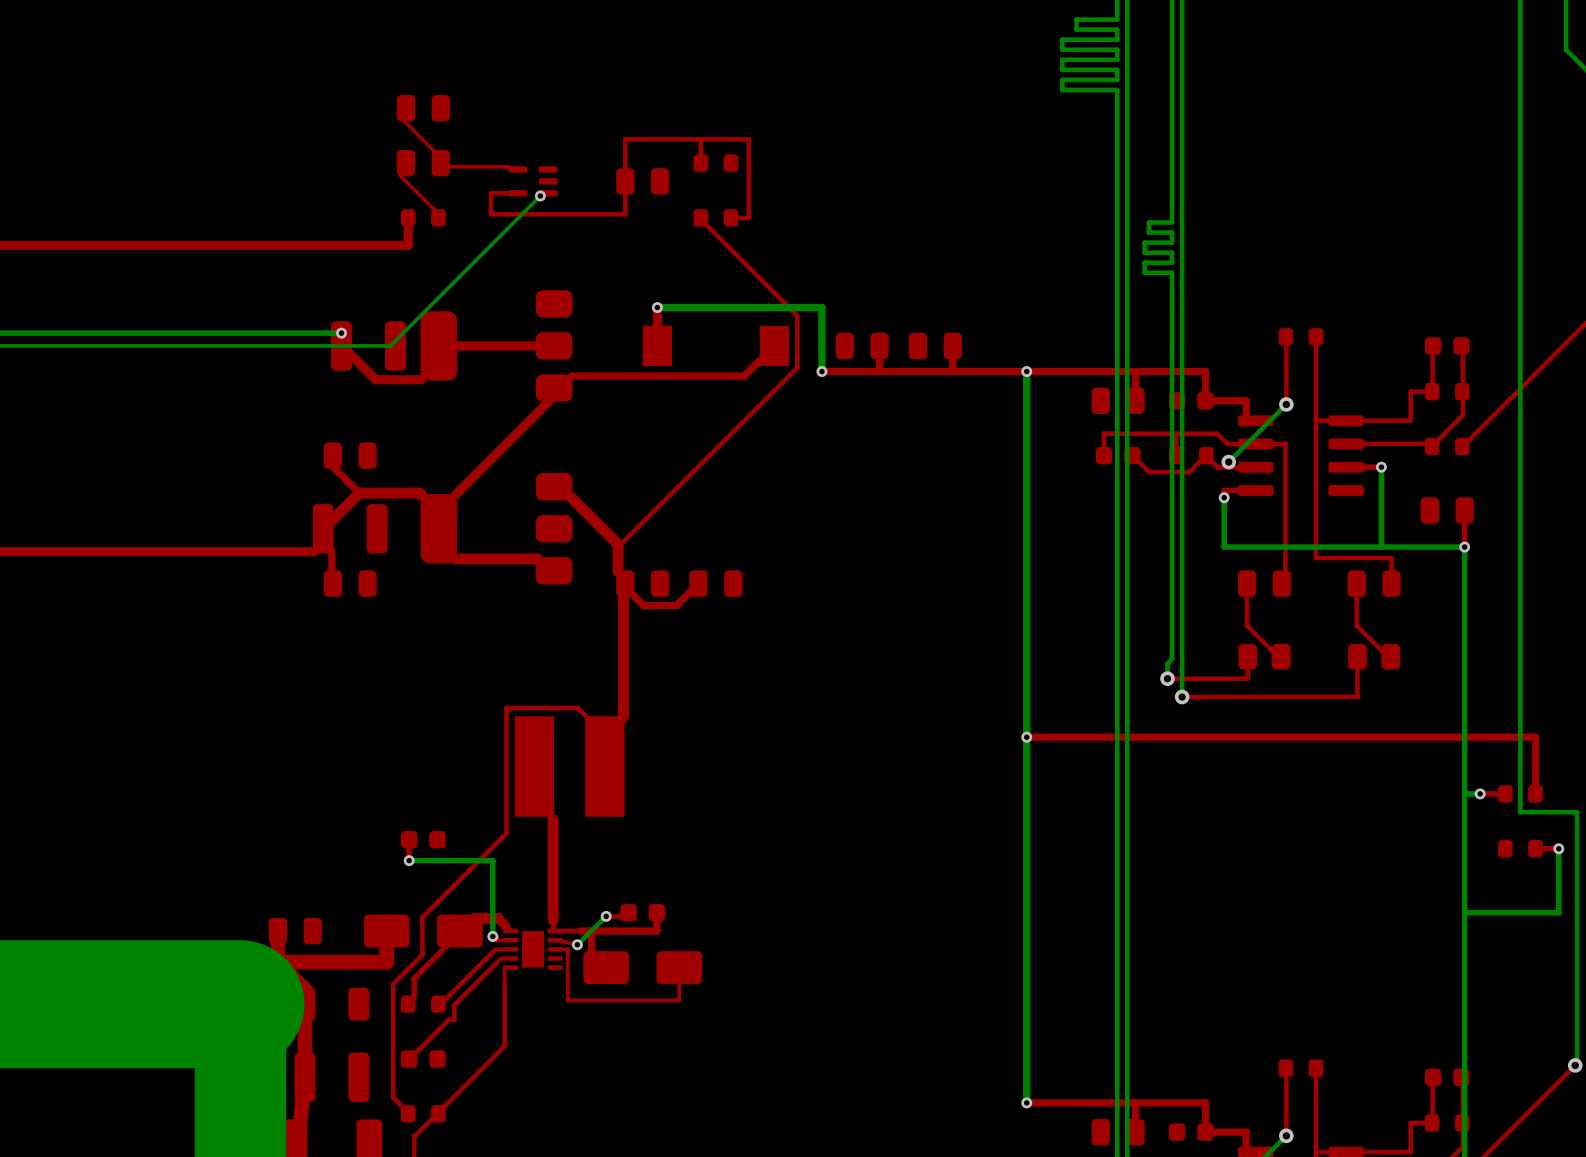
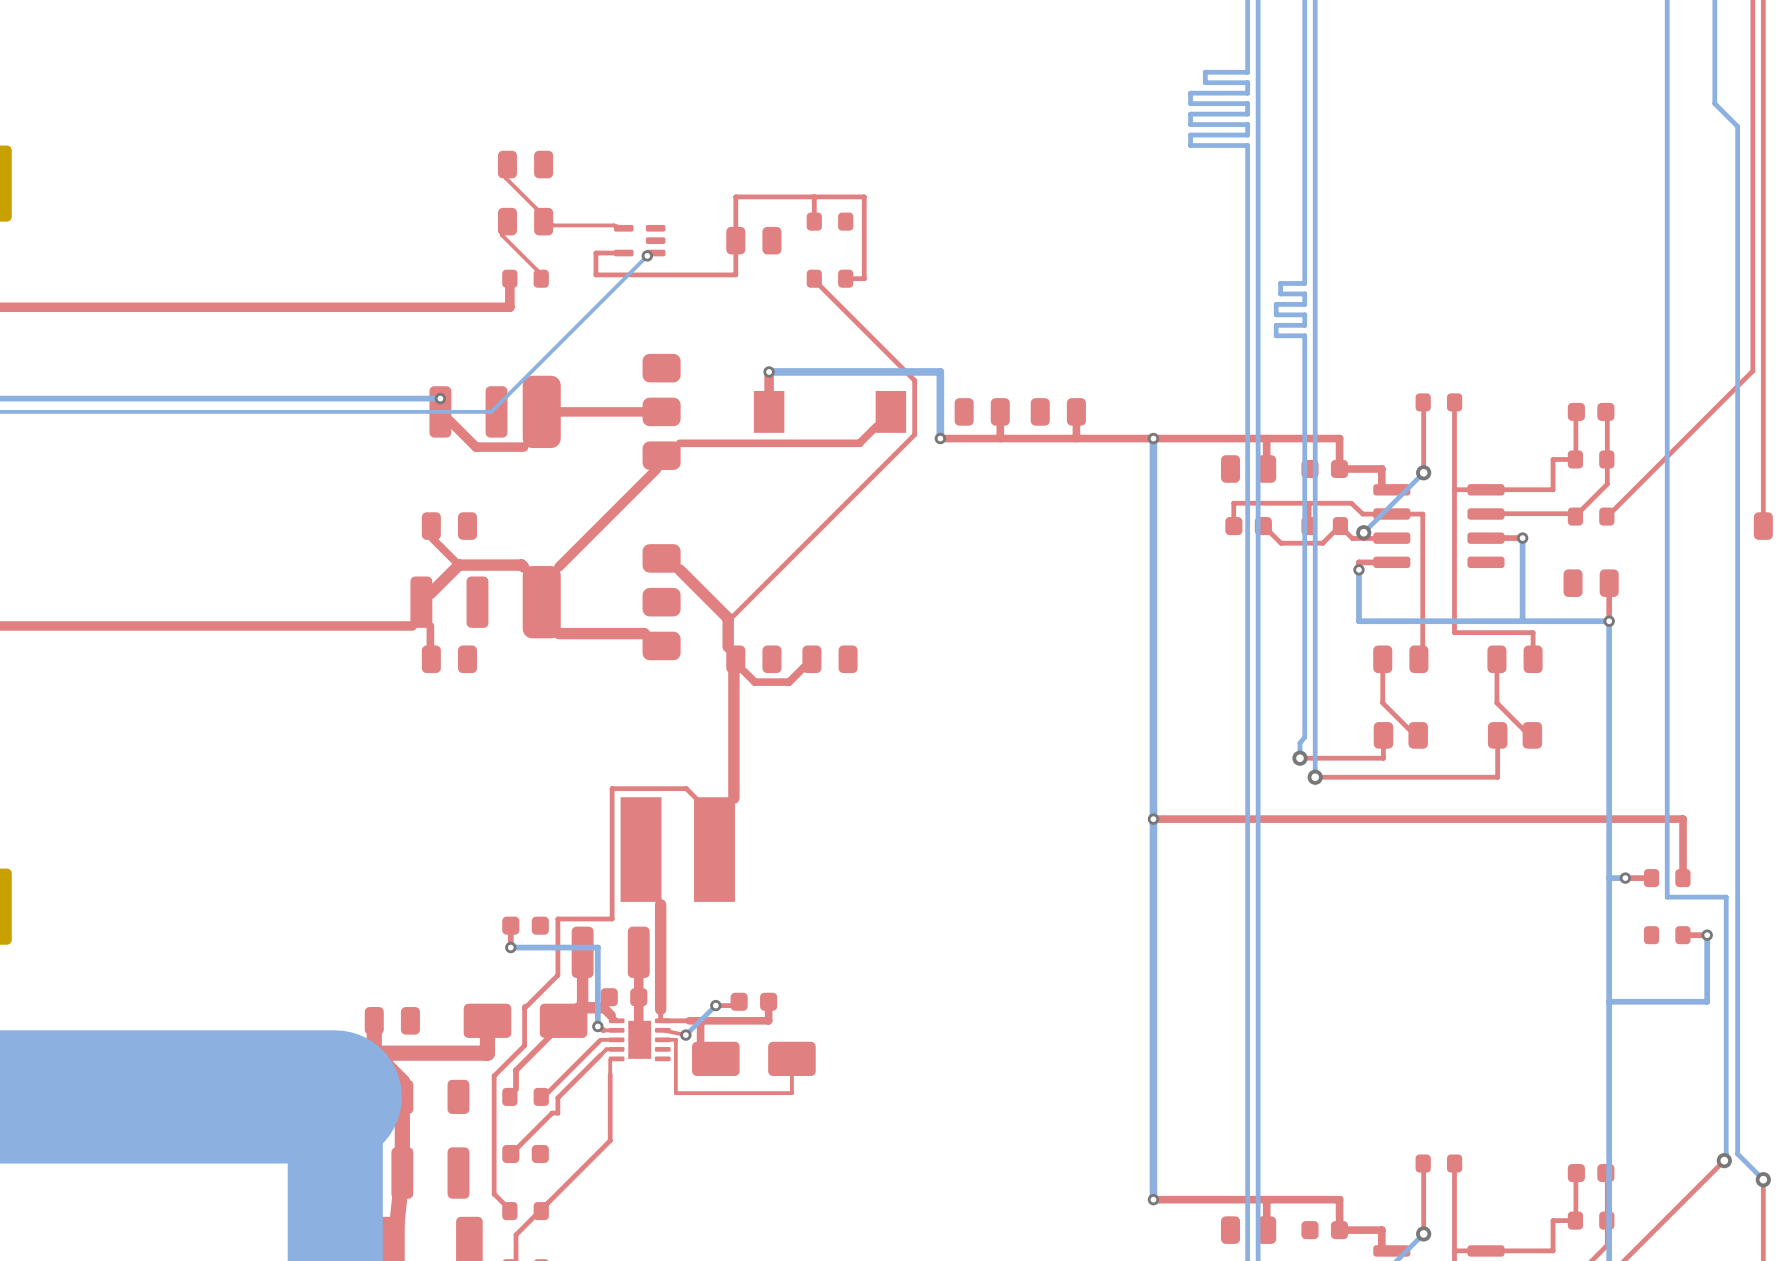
top track: (506, 833) (422, 917) -> (612, 919) (557, 919) (557, 975) (524, 1008)
part: none -> (610, 952)
top track: none -> (582, 977) (582, 1007)
top track: none -> (638, 977) (638, 1020)
part: none -> (624, 997)

